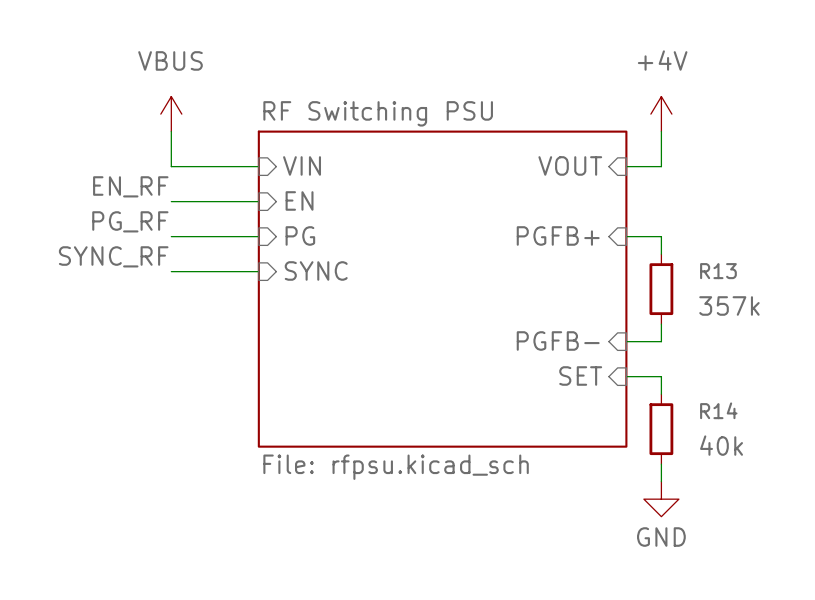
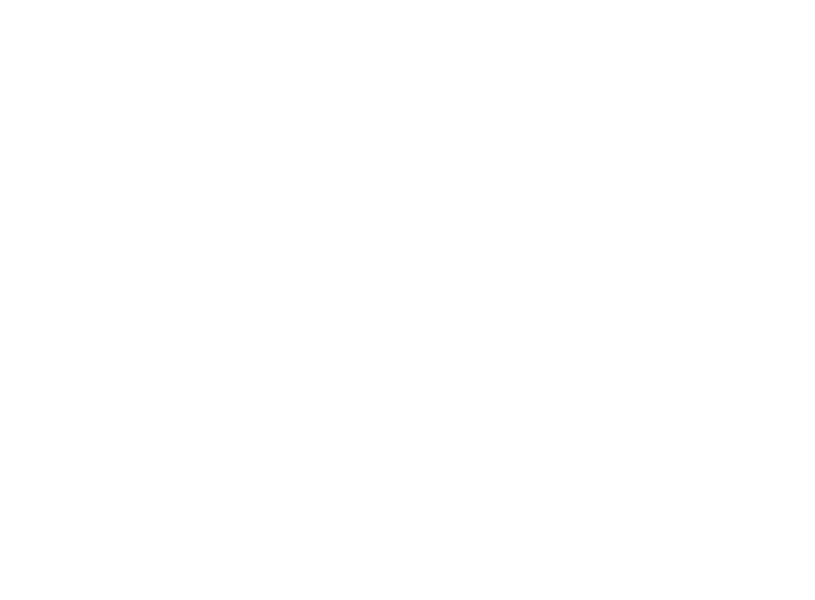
power symbol: VBUS (171, 114) -> none
power symbol: +4V (661, 114) -> none
wire: (171, 131) (171, 166) (258, 166) -> none
wire: (661, 131) (661, 166) (626, 166) -> none
sheet pin: VIN (302, 165) -> none
sheet pin: VOUT (570, 165) -> none
label: EN_RF (130, 186) -> none
sheet pin: EN (299, 200) -> none
wire: (171, 201) (258, 201) -> none
label: PG_RF (130, 221) -> none
sheet pin: PG (300, 235) -> none
sheet pin: PGFB+ (558, 235) -> none
wire: (171, 236) (258, 236) -> none
wire: (626, 236) (661, 236) (661, 254) -> none
label: SYNC_RF (113, 256) -> none
sheet pin: SYNC (316, 270) -> none
wire: (171, 271) (258, 271) -> none
sheet RF Switching PSU: File: rfpsu.kicad_sch (442, 289) -> none
R13: 357k (661, 289) -> none
wire: (661, 324) (661, 341) (626, 341) -> none
sheet pin: PGFB- (558, 340) -> none
sheet pin: SET (580, 375) -> none
wire: (626, 376) (661, 376) (661, 394) -> none
R14: 40k (661, 429) -> none
wire: (661, 464) (661, 481) -> none
power symbol: GND (661, 499) -> none

